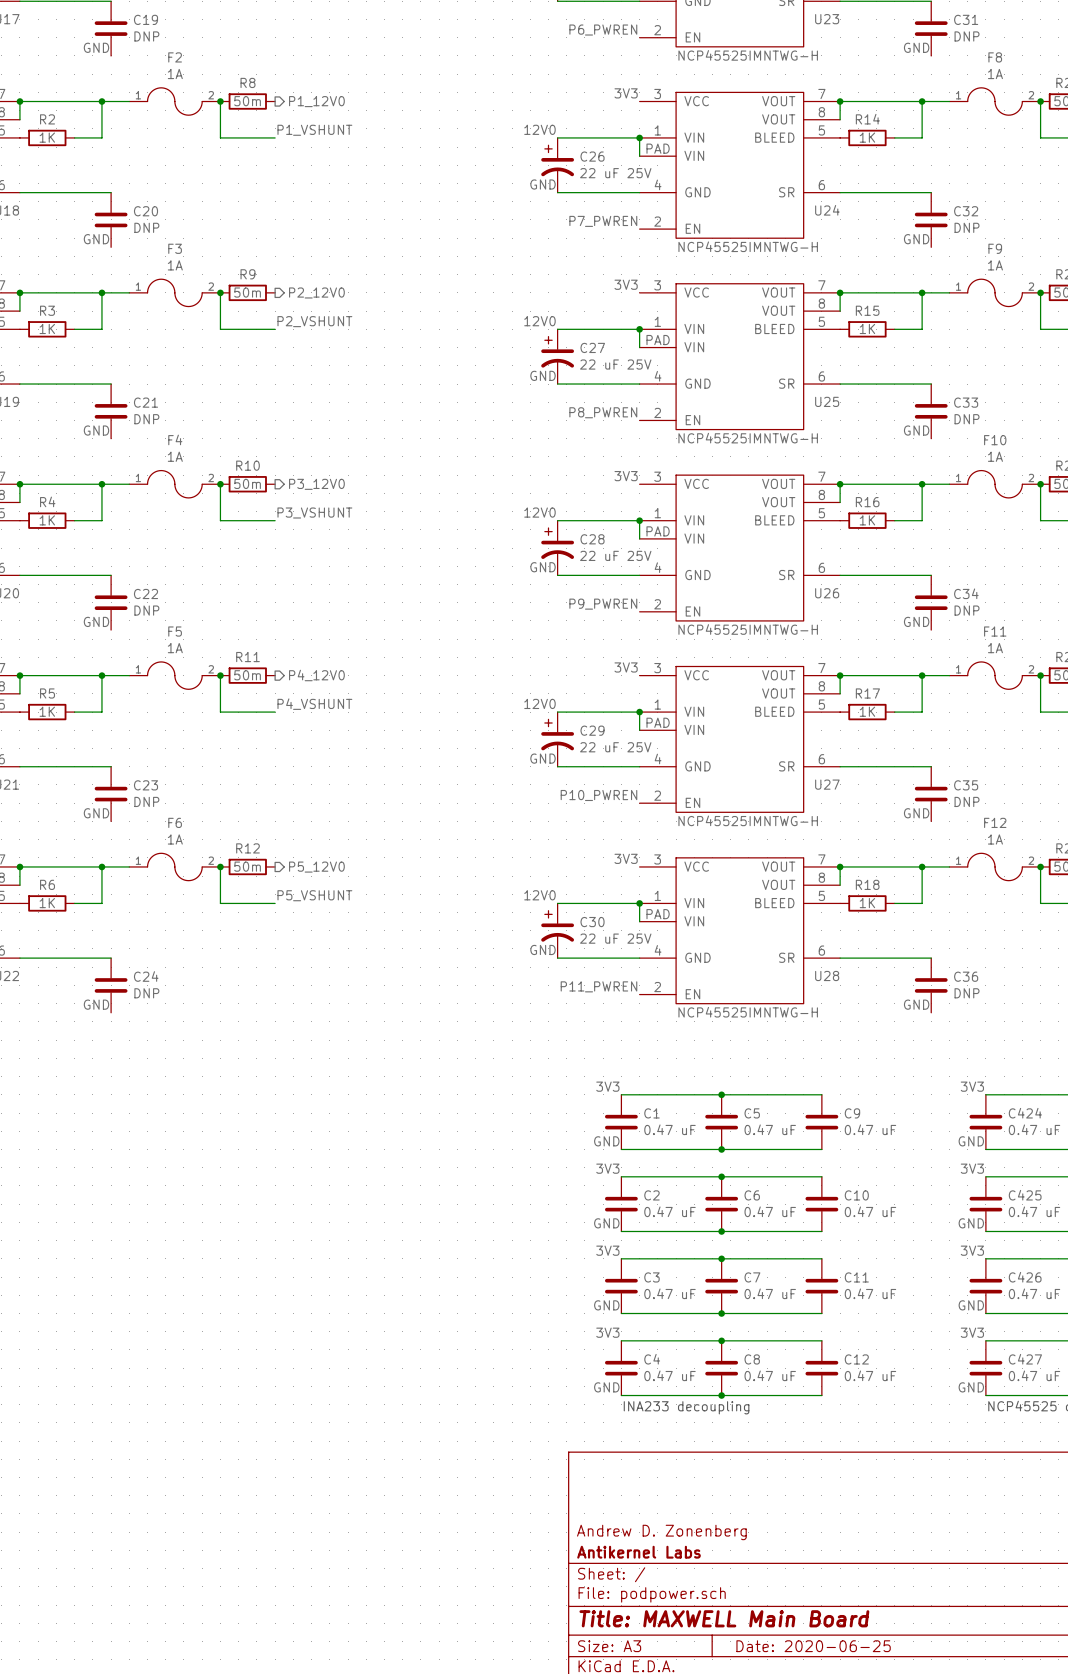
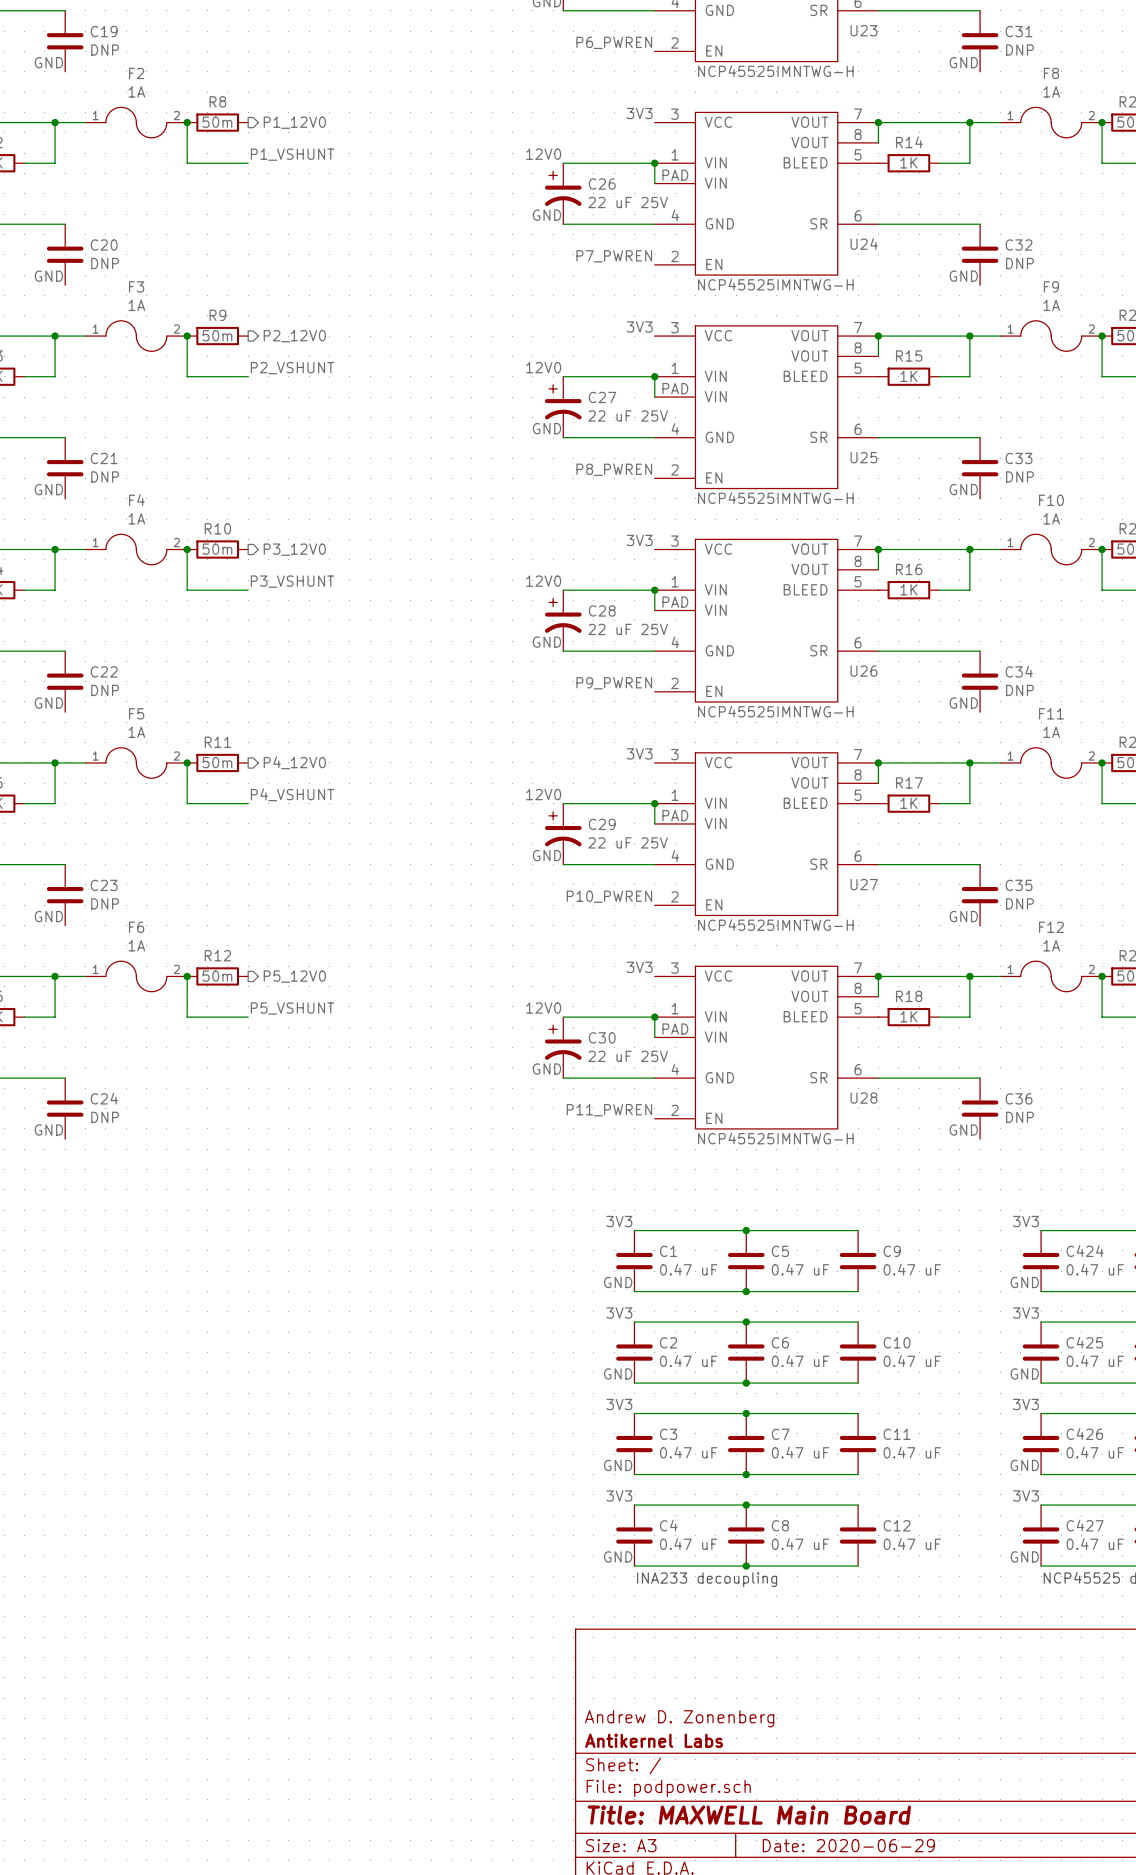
title block: Date: 2020-06-25 (813, 1646) -> Date: 2020-06-29 (848, 1845)

